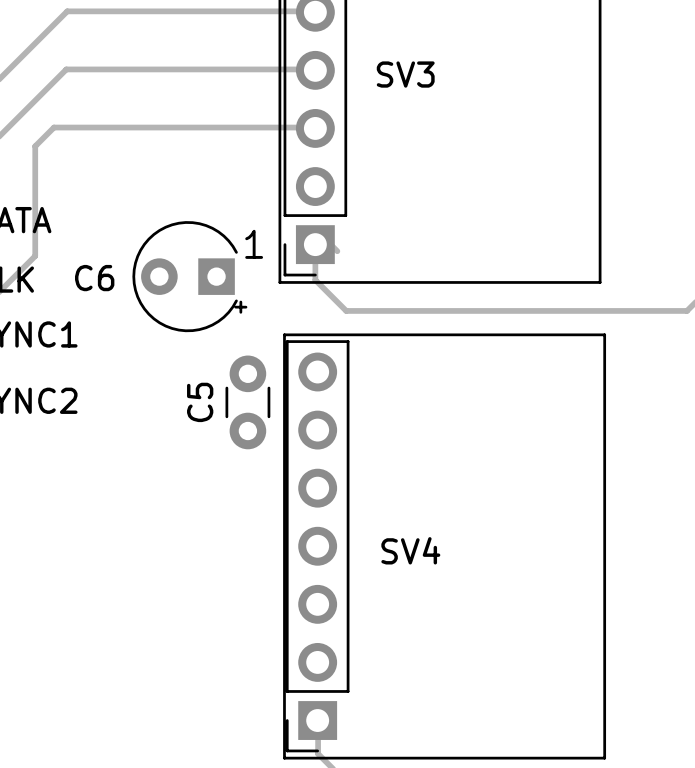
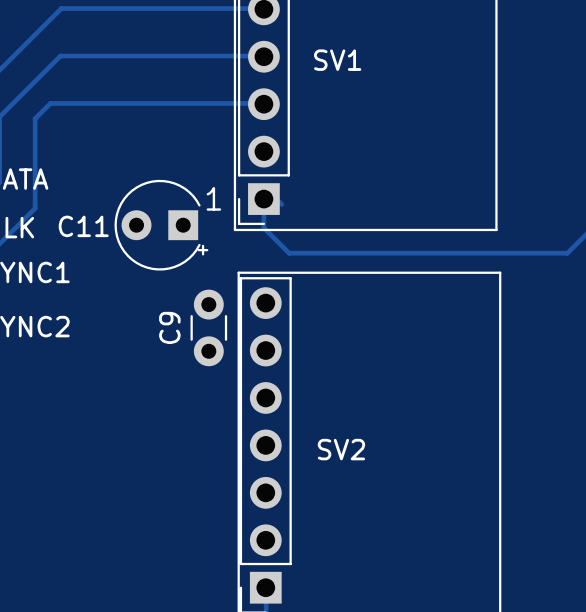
SV3 name: SV3 (405, 74) -> SV1 (337, 60)
C6 name: C6 (94, 278) -> C11 (83, 226)
C5 name: C5 (200, 402) -> C9 (169, 327)
SV4 name: SV4 (410, 550) -> SV2 (341, 449)

